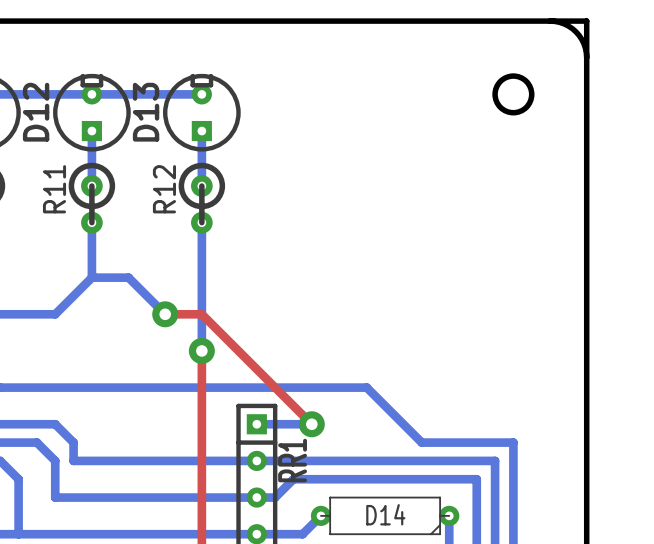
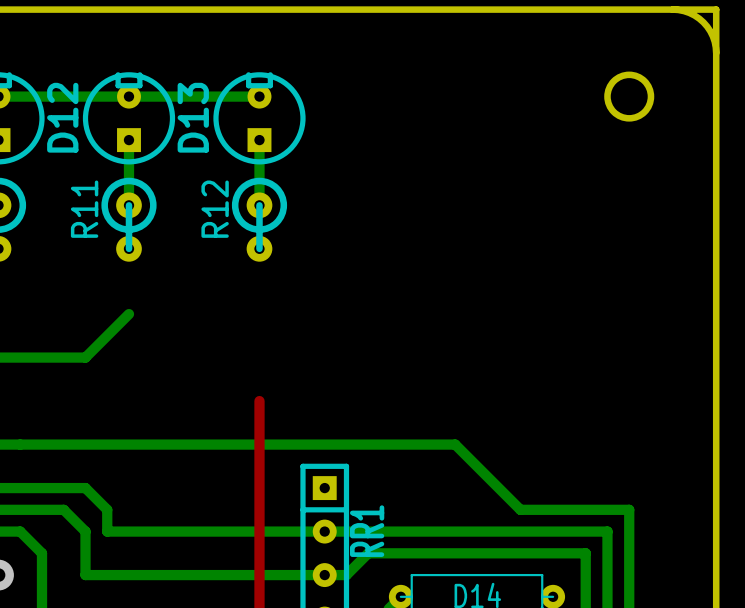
bottom track: (91, 222) (91, 277) (128, 277) (165, 314) -> none
bottom track: (201, 222) (201, 350) -> none
top track: (165, 314) (201, 314) (311, 424) -> none
via: (165, 314) -> none
via: (201, 350) -> none
bottom track: (256, 424) (311, 424) -> none
via: (311, 424) -> none

